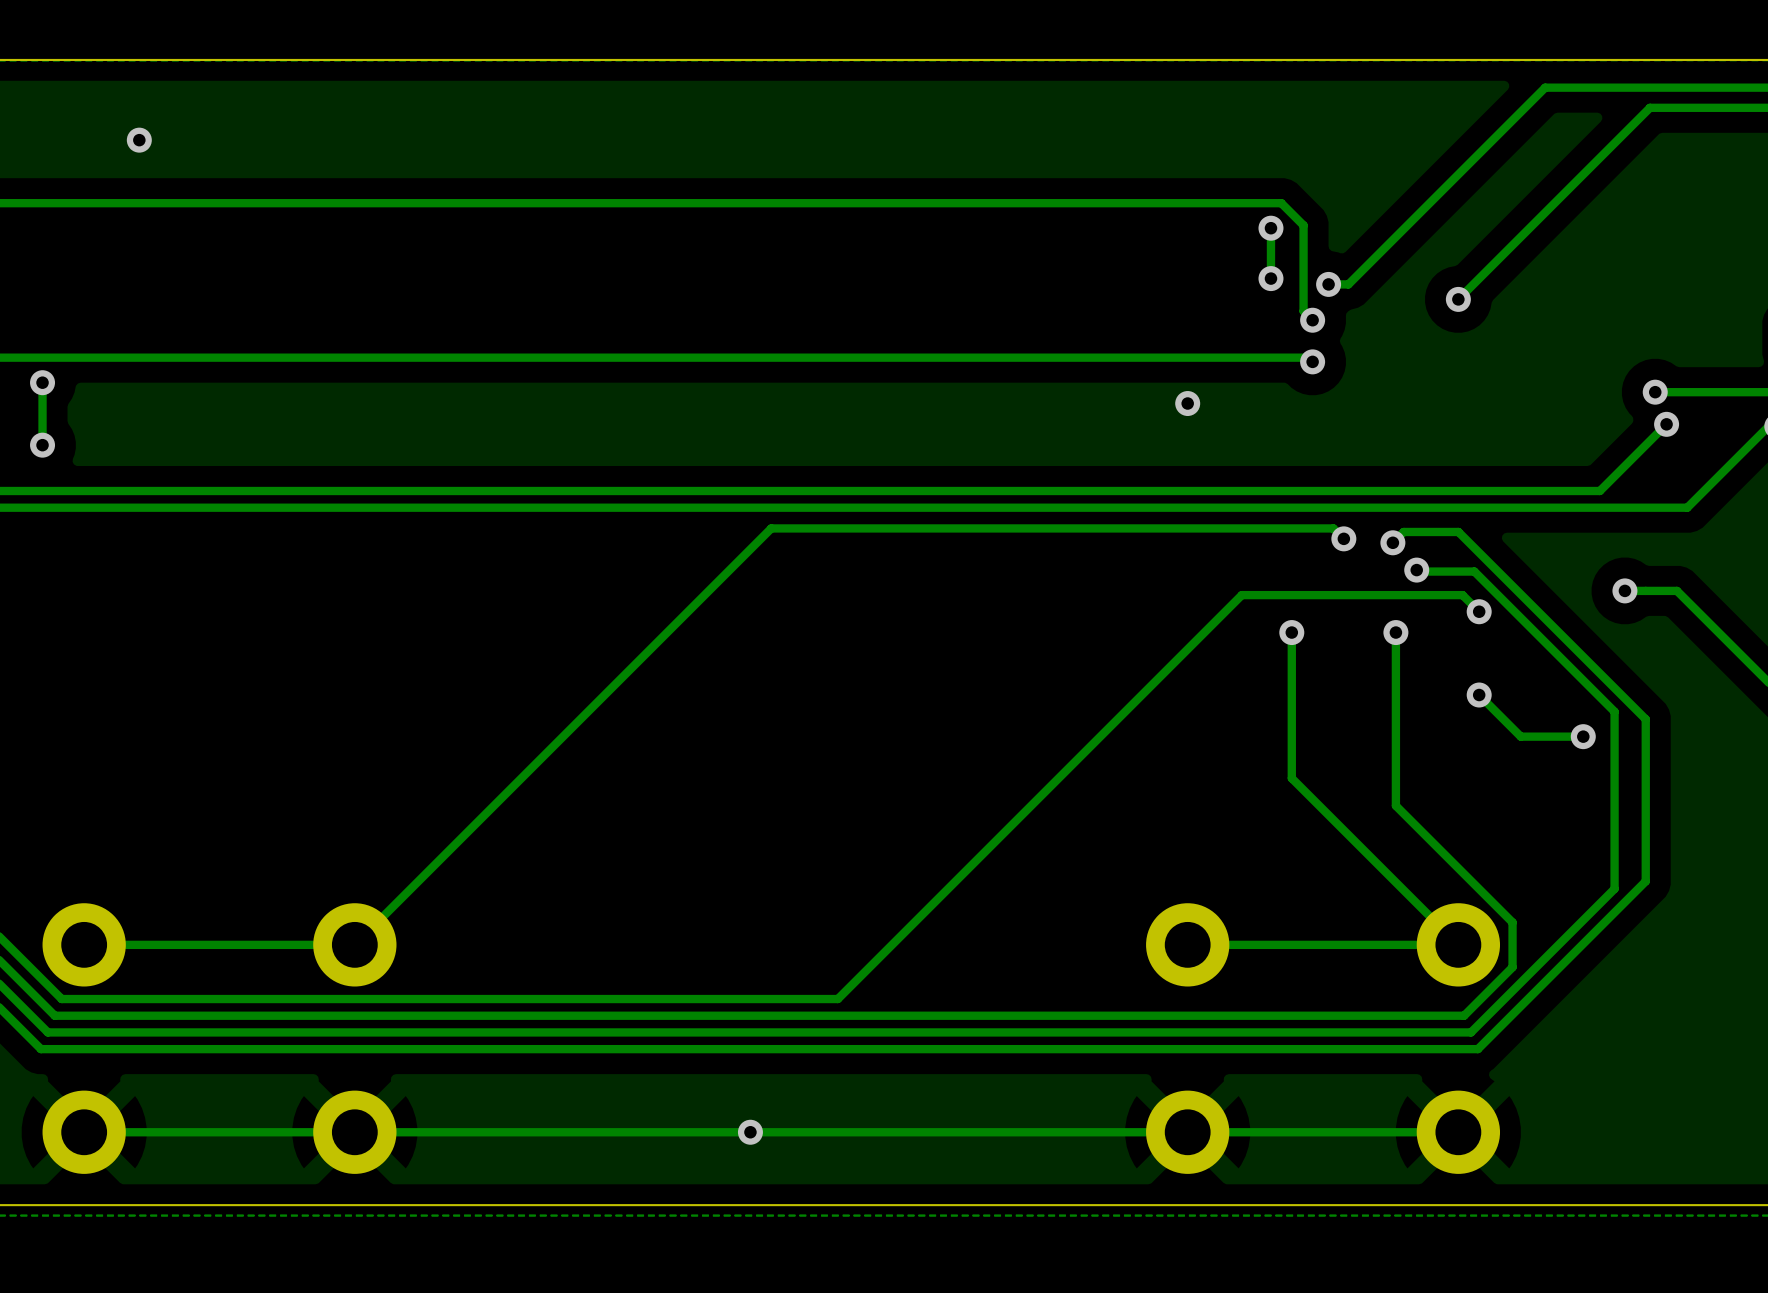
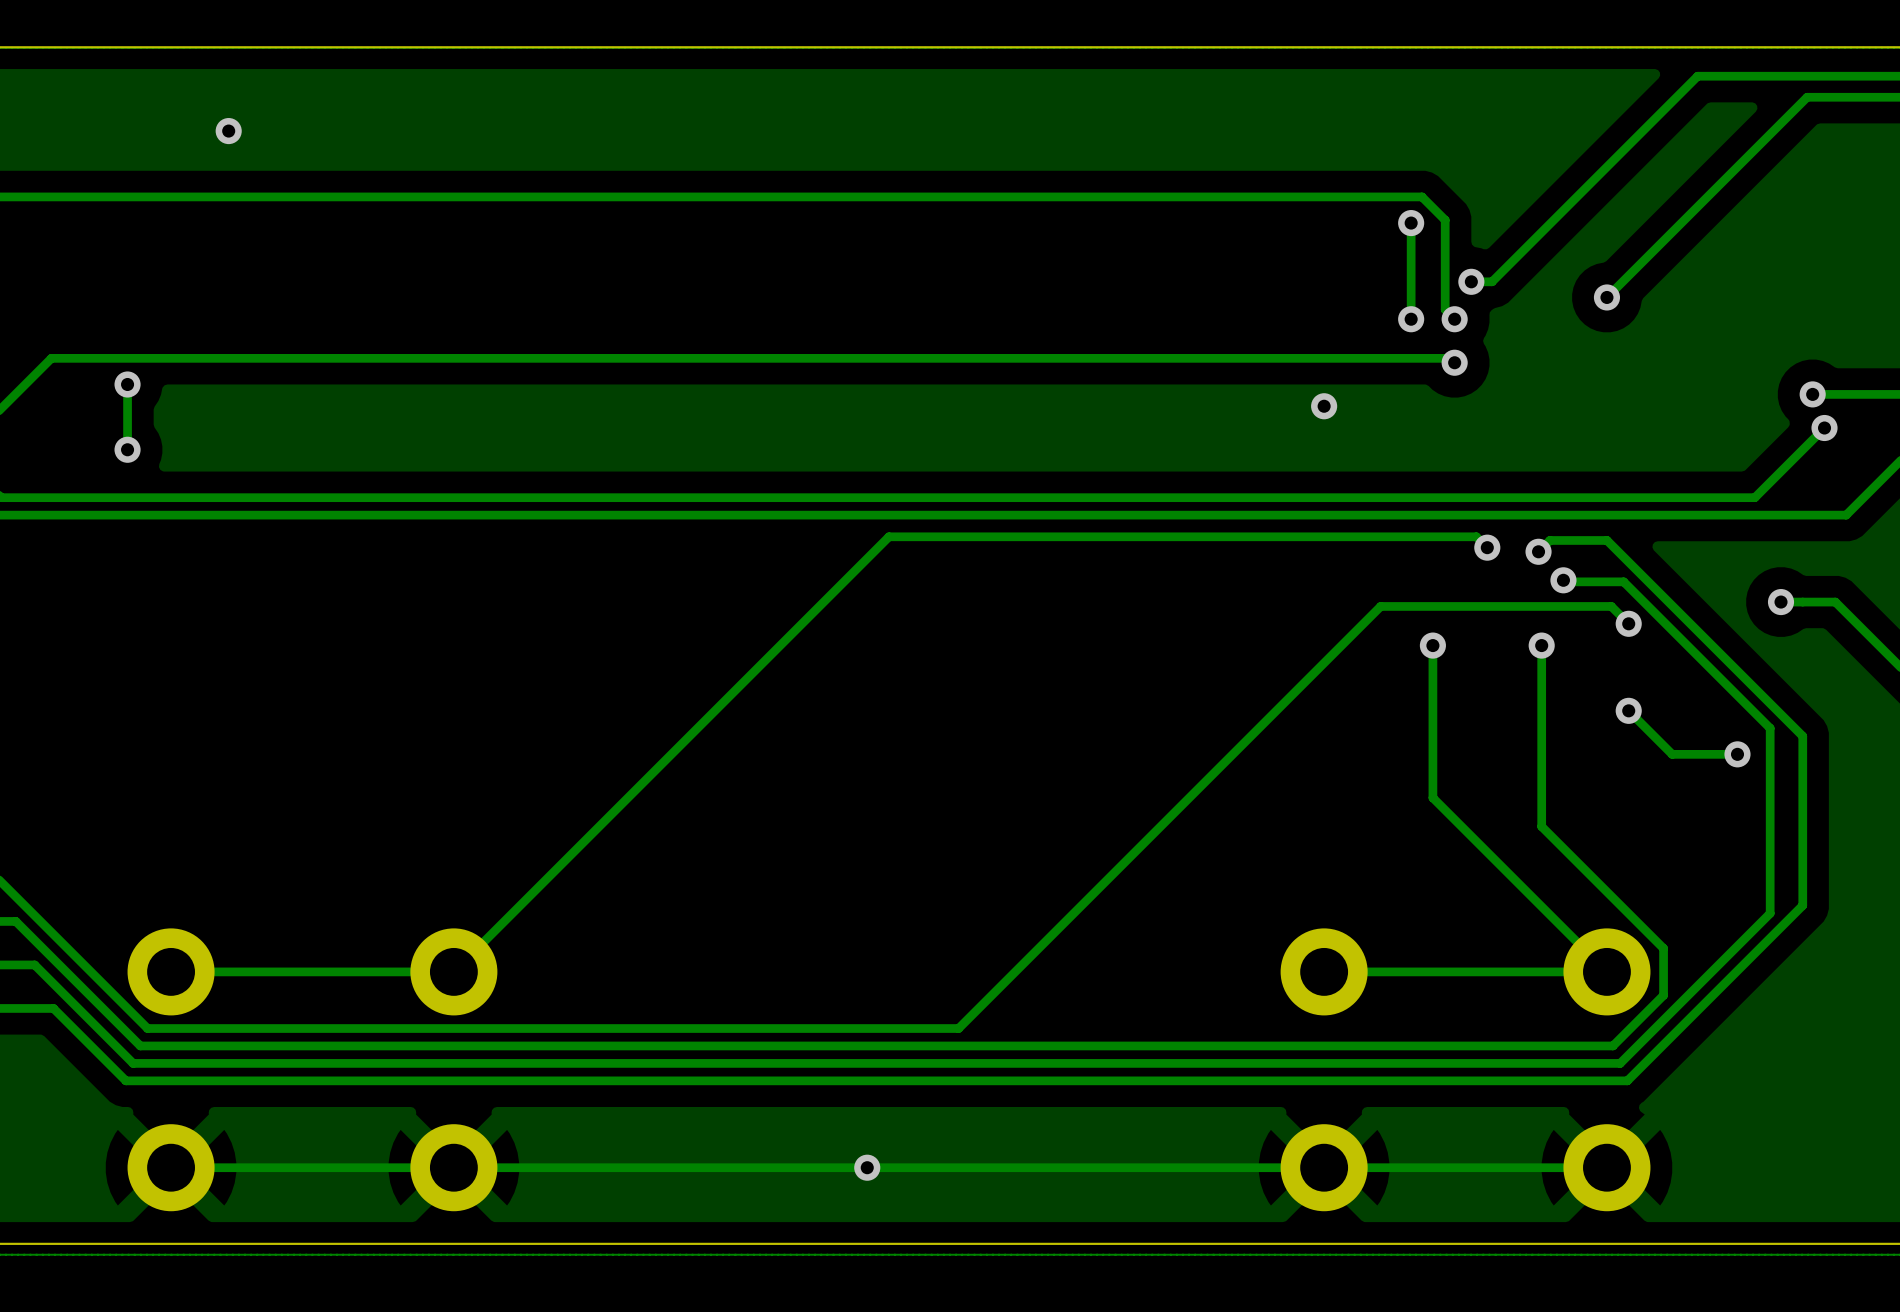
track: none -> (1411, 275) (1411, 319)
via position: (1270, 278) -> (1411, 319)

